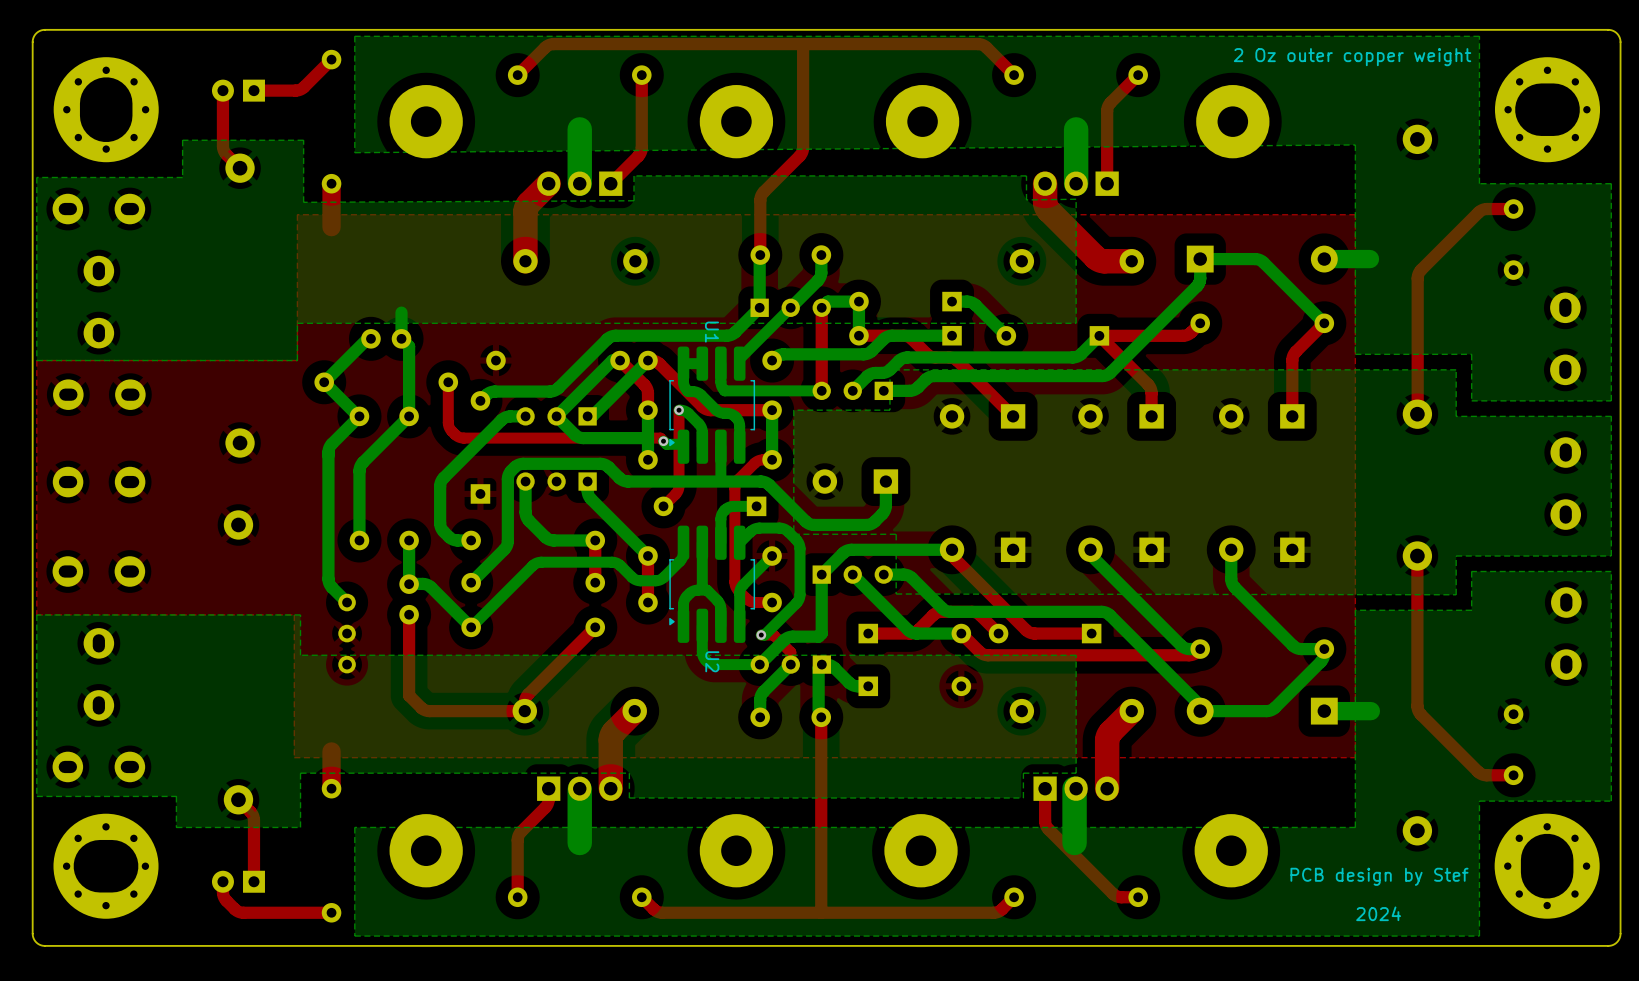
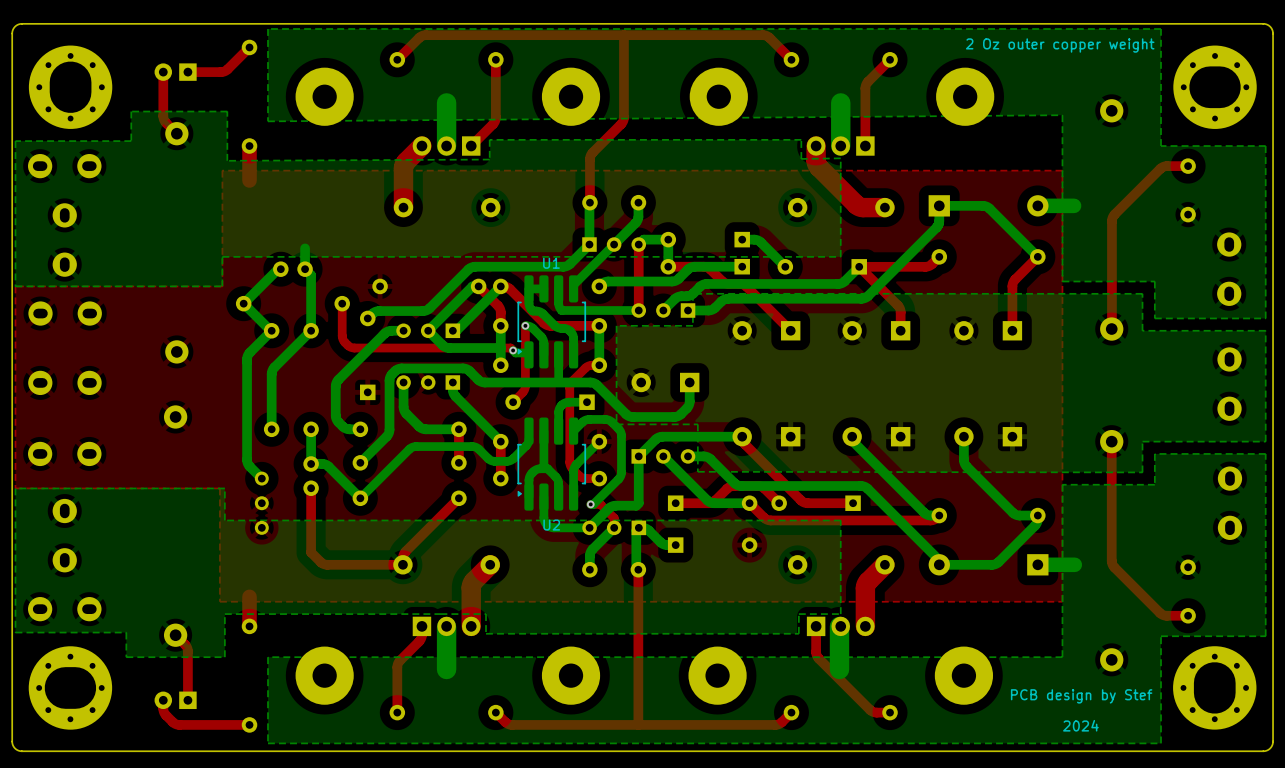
U1 name rotation: 0° (711, 332) -> 90° counterclockwise (551, 263)
U2 name rotation: 0° (712, 661) -> 90° counterclockwise (551, 525)

